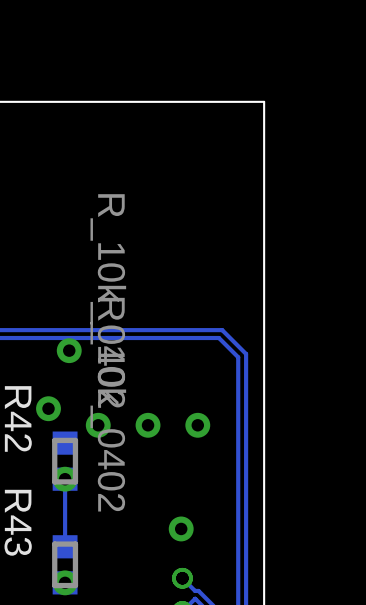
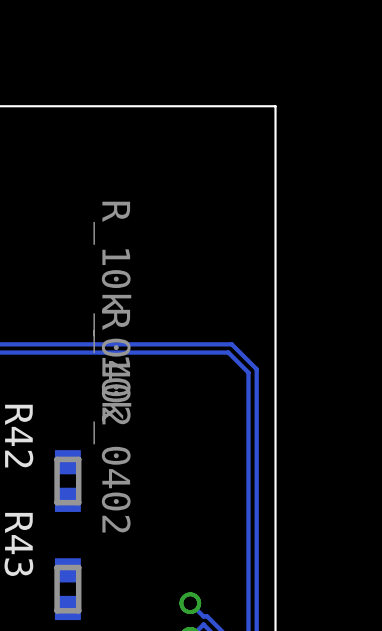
via: (69, 350) -> none
via: (48, 408) -> none
via: (98, 425) -> none
via: (148, 425) -> none
via: (197, 425) -> none
track: (65, 479) (65, 546) -> none
via: (65, 479) -> none
via: (181, 528) -> none
via: (65, 582) -> none

